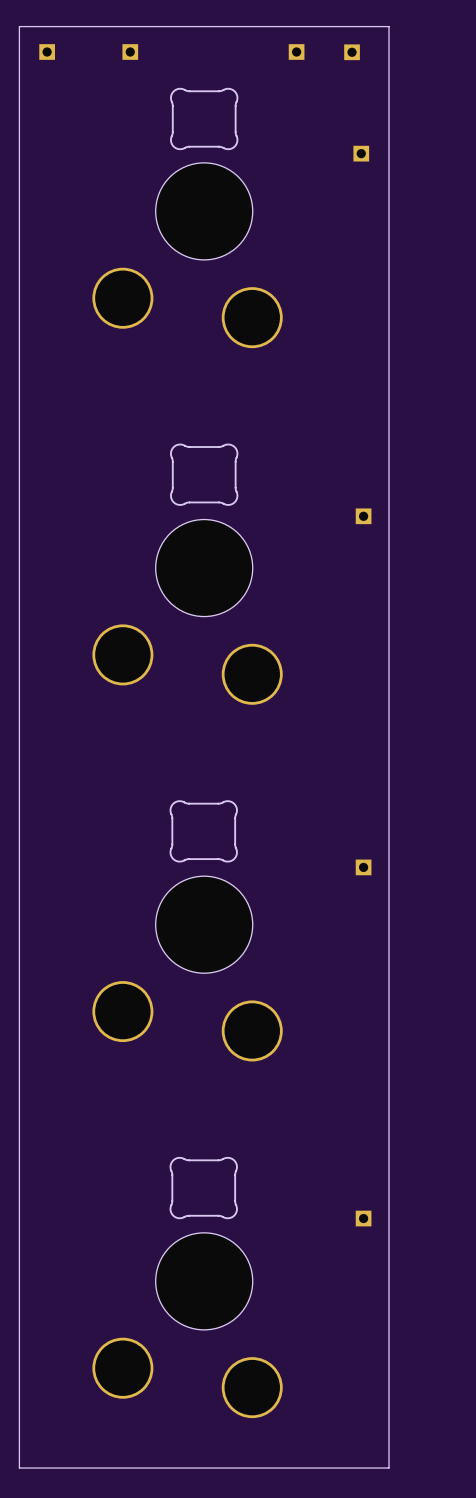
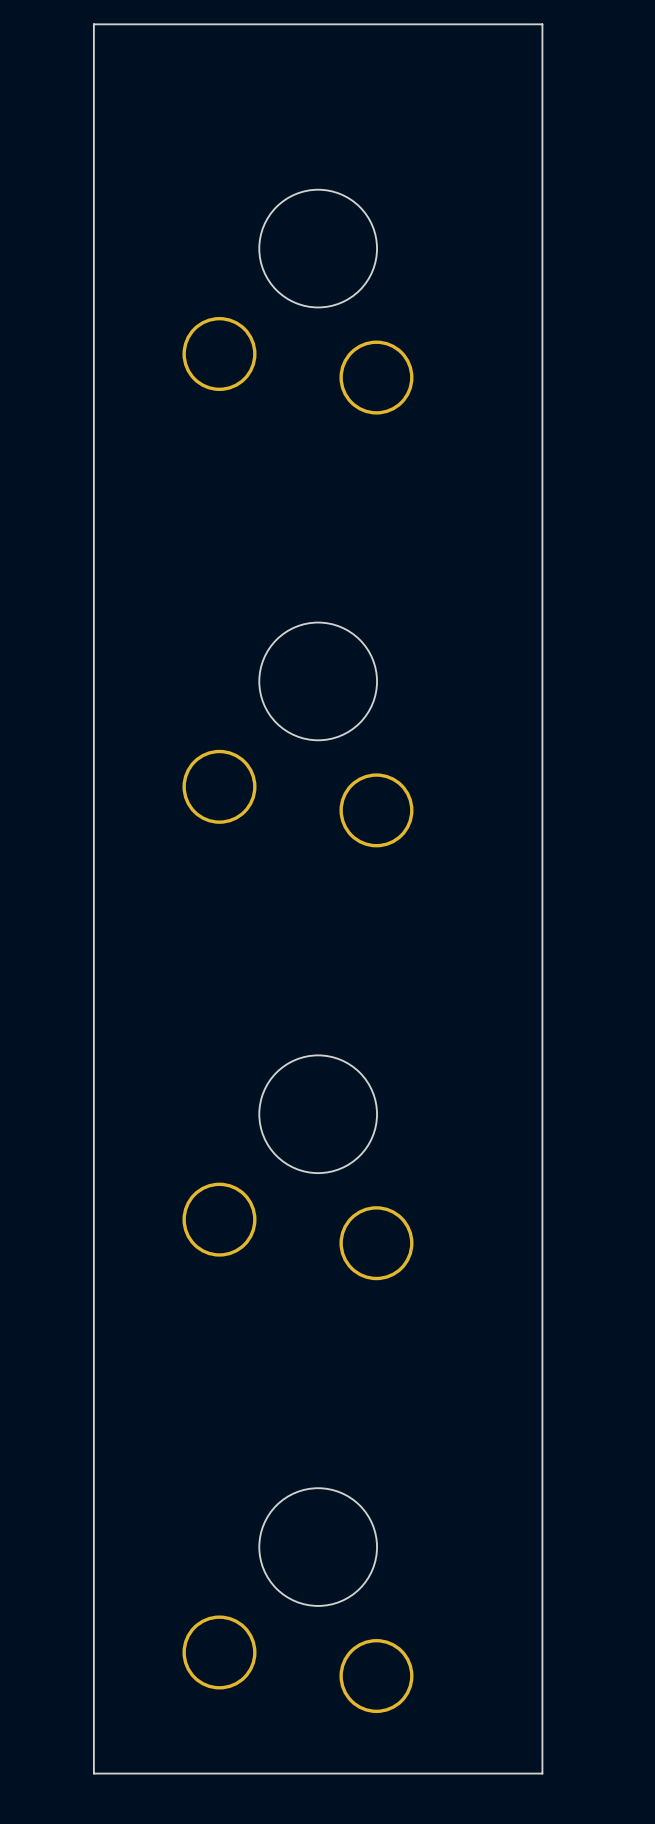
part: (47, 52) -> none
part: (130, 52) -> none
part: (296, 52) -> none
part: (352, 52) -> none
part: (204, 118) -> none
part: (361, 153) -> none
part: (204, 474) -> none
part: (363, 516) -> none
part: (203, 831) -> none
part: (363, 867) -> none
part: (203, 1188) -> none
part: (363, 1218) -> none

